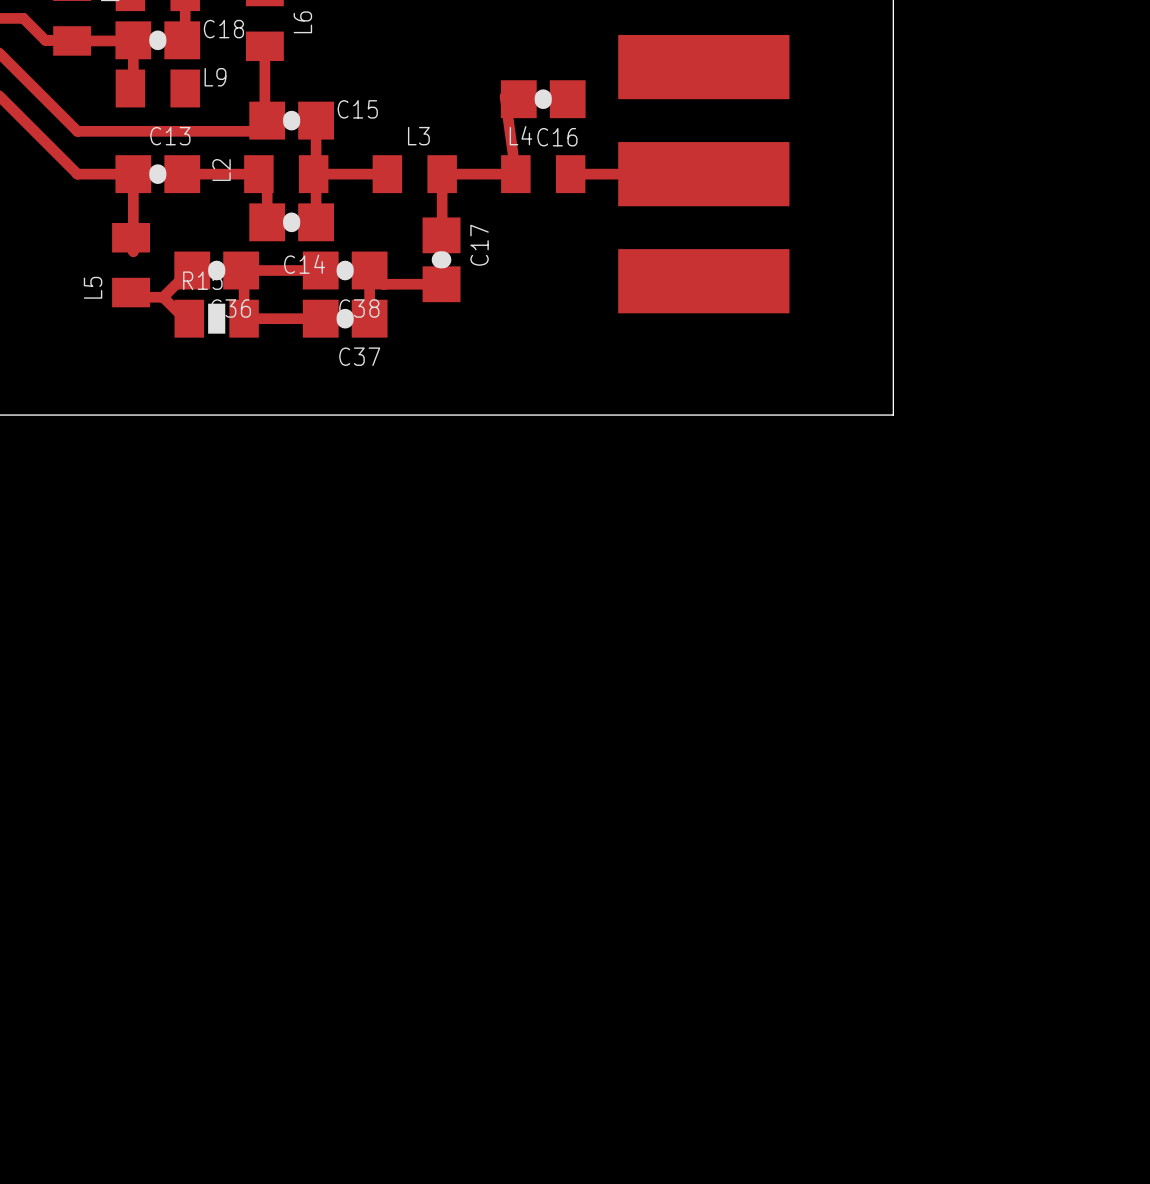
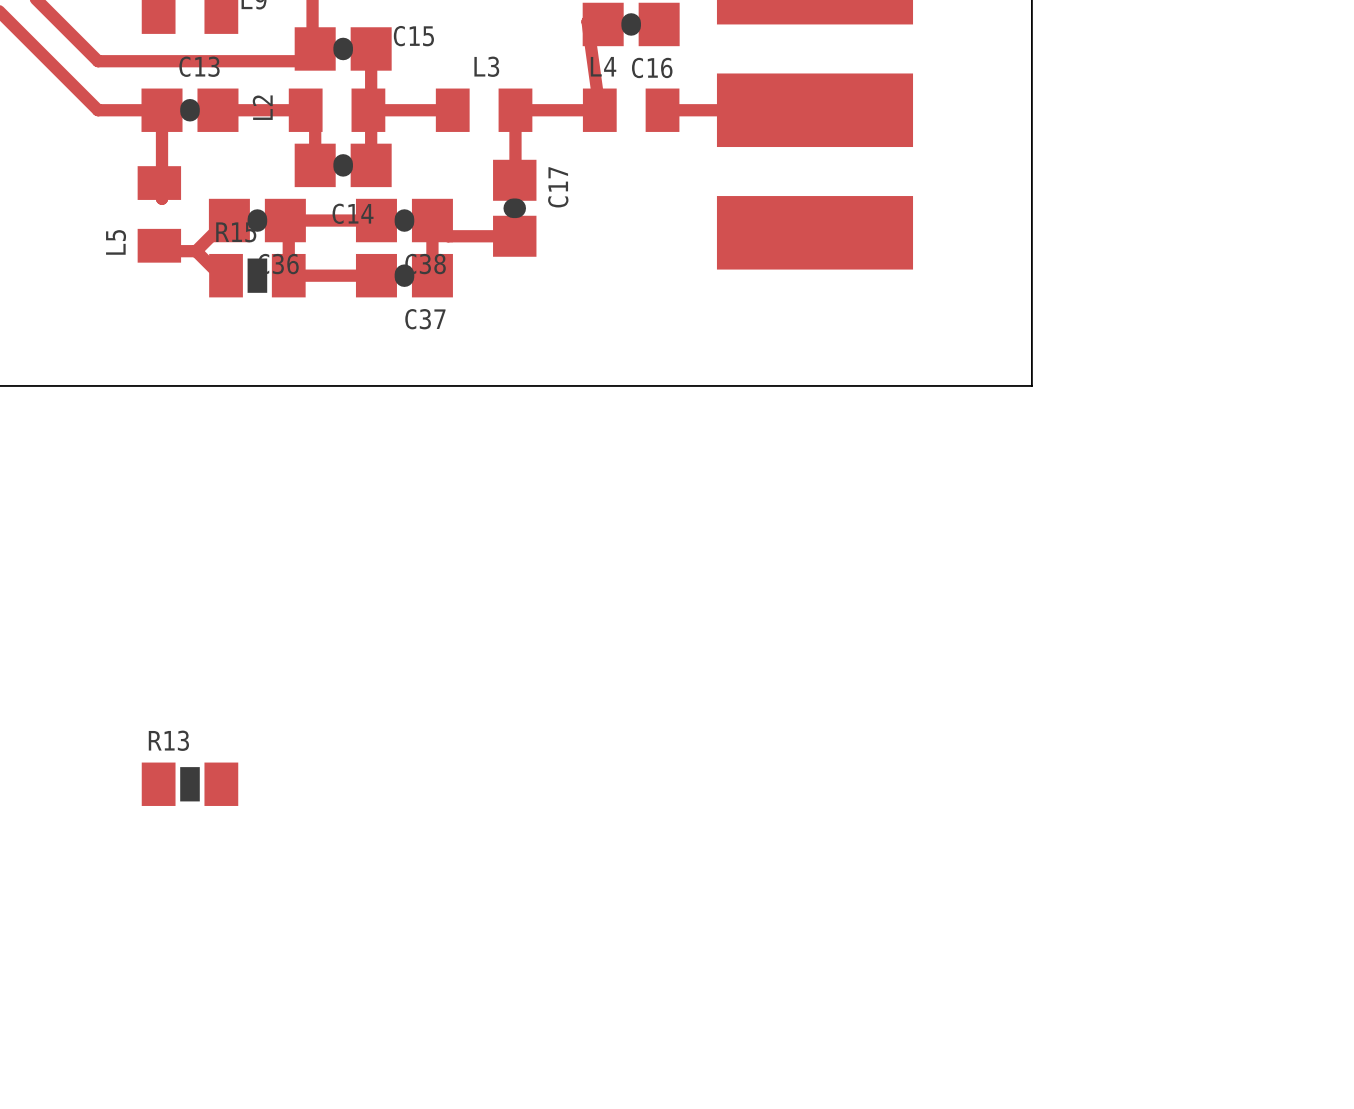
R13: none -> (189, 784)

